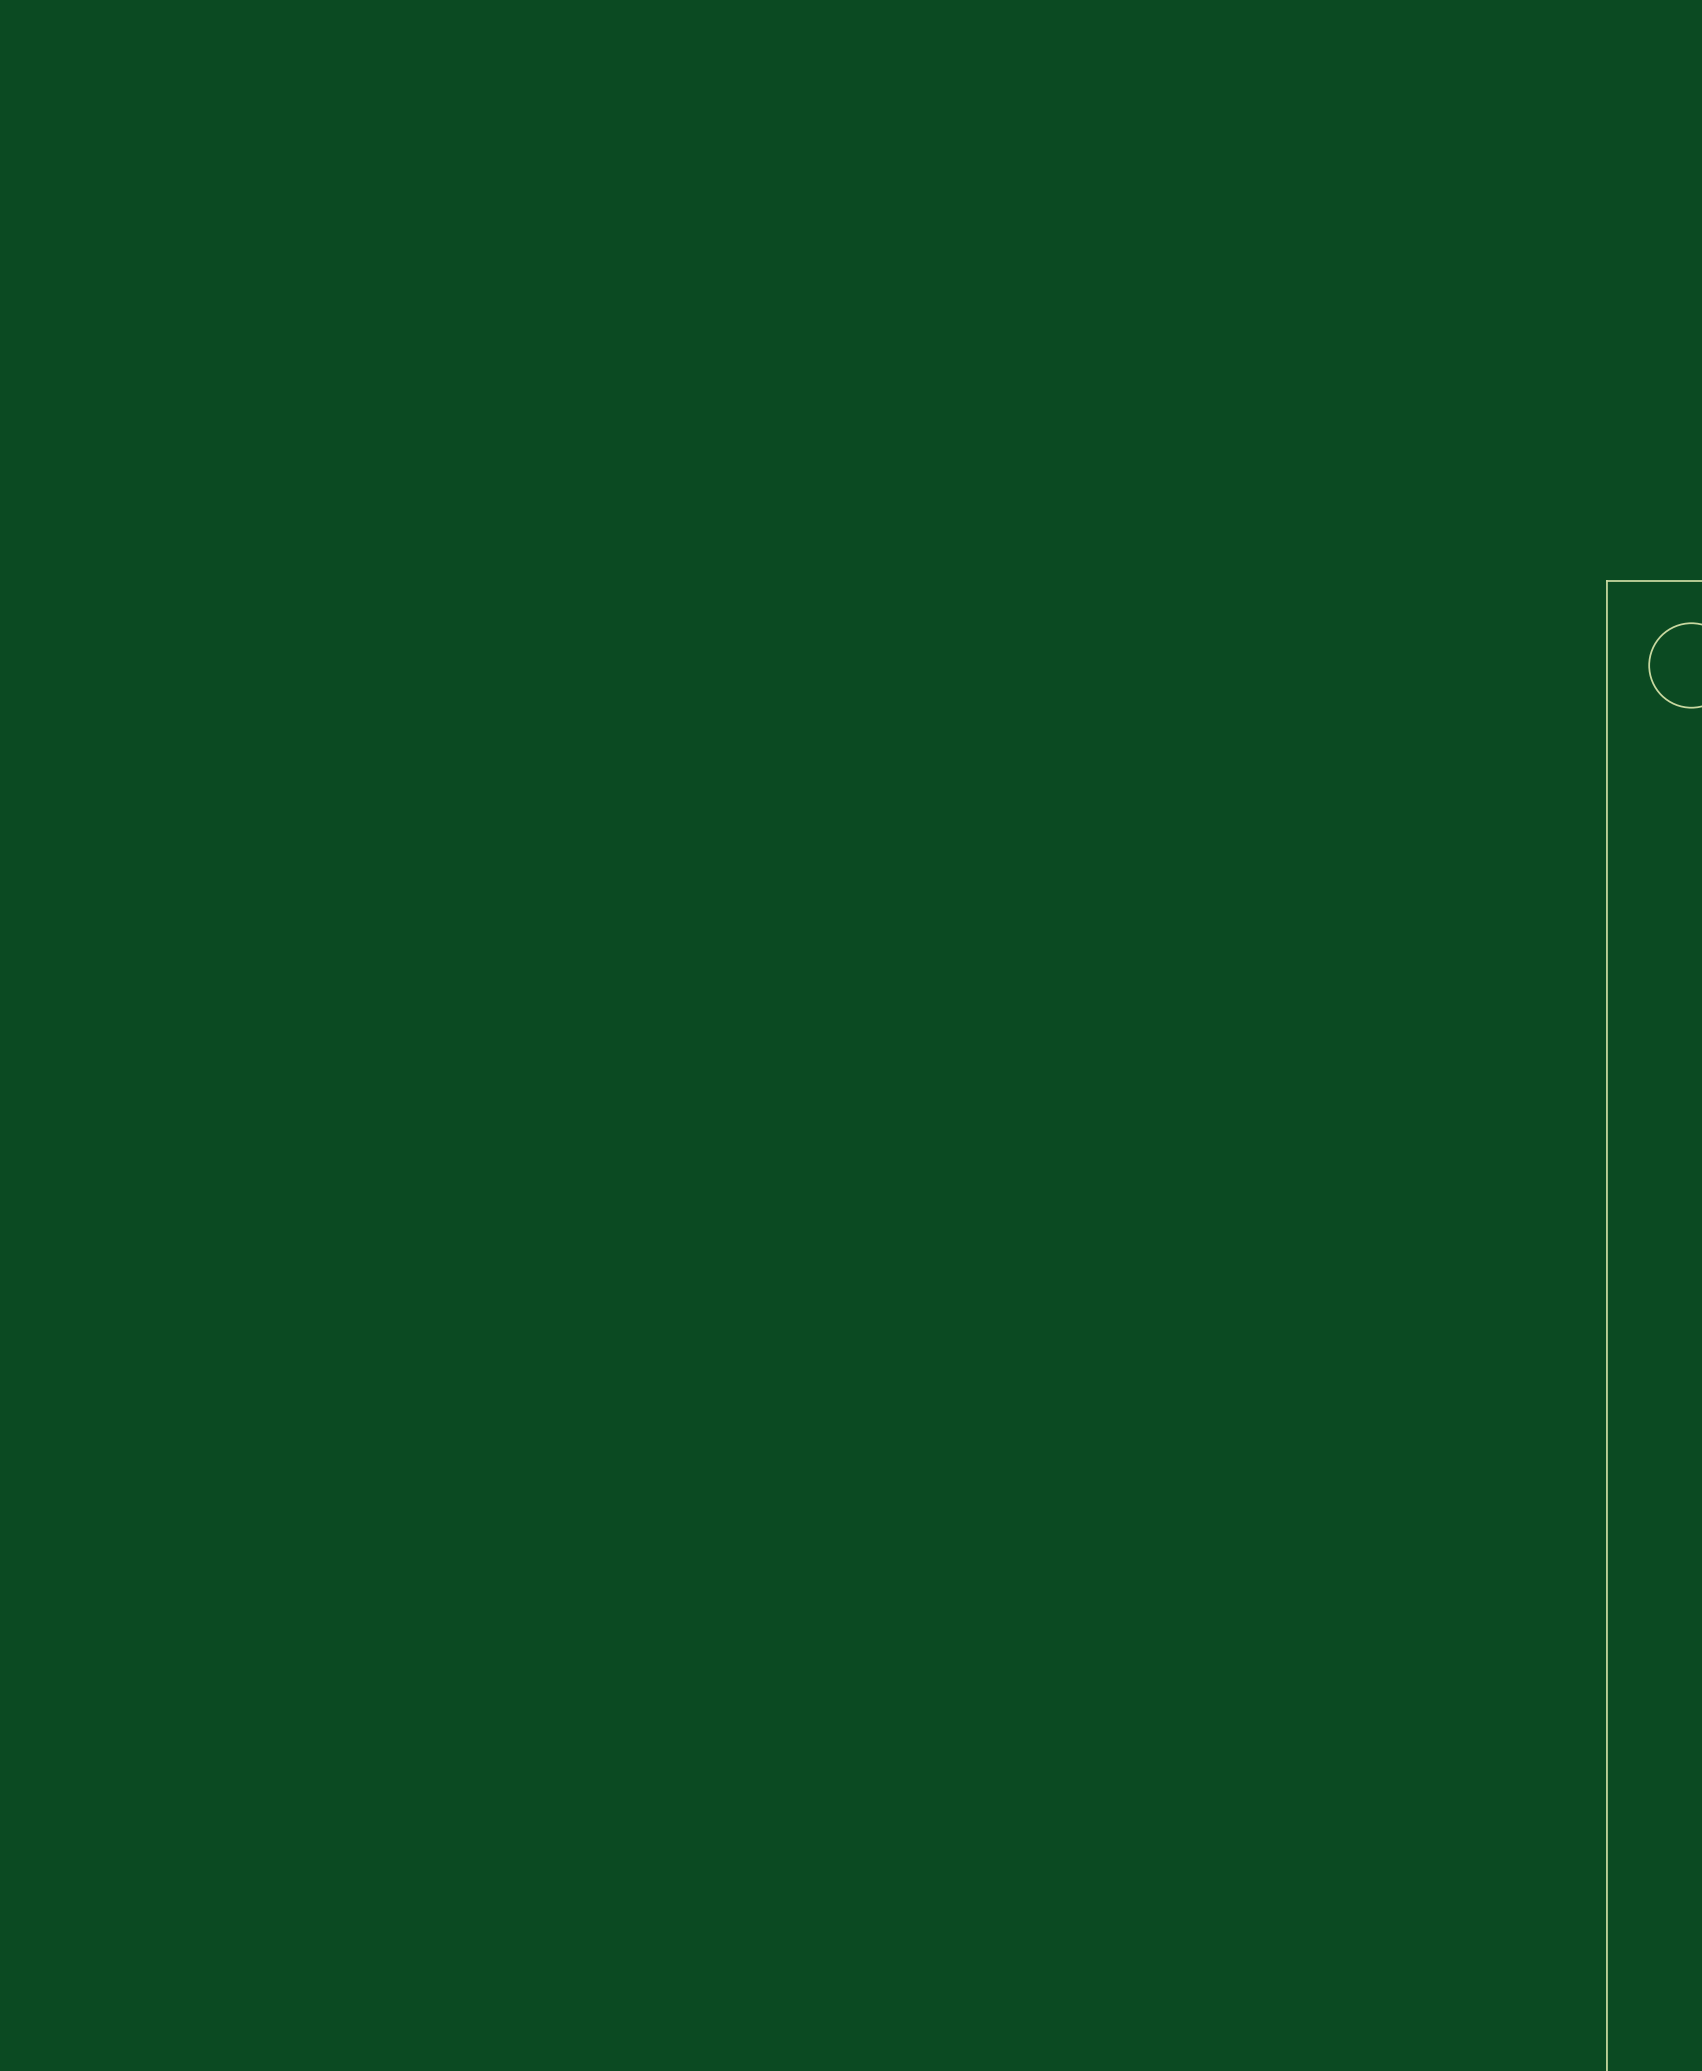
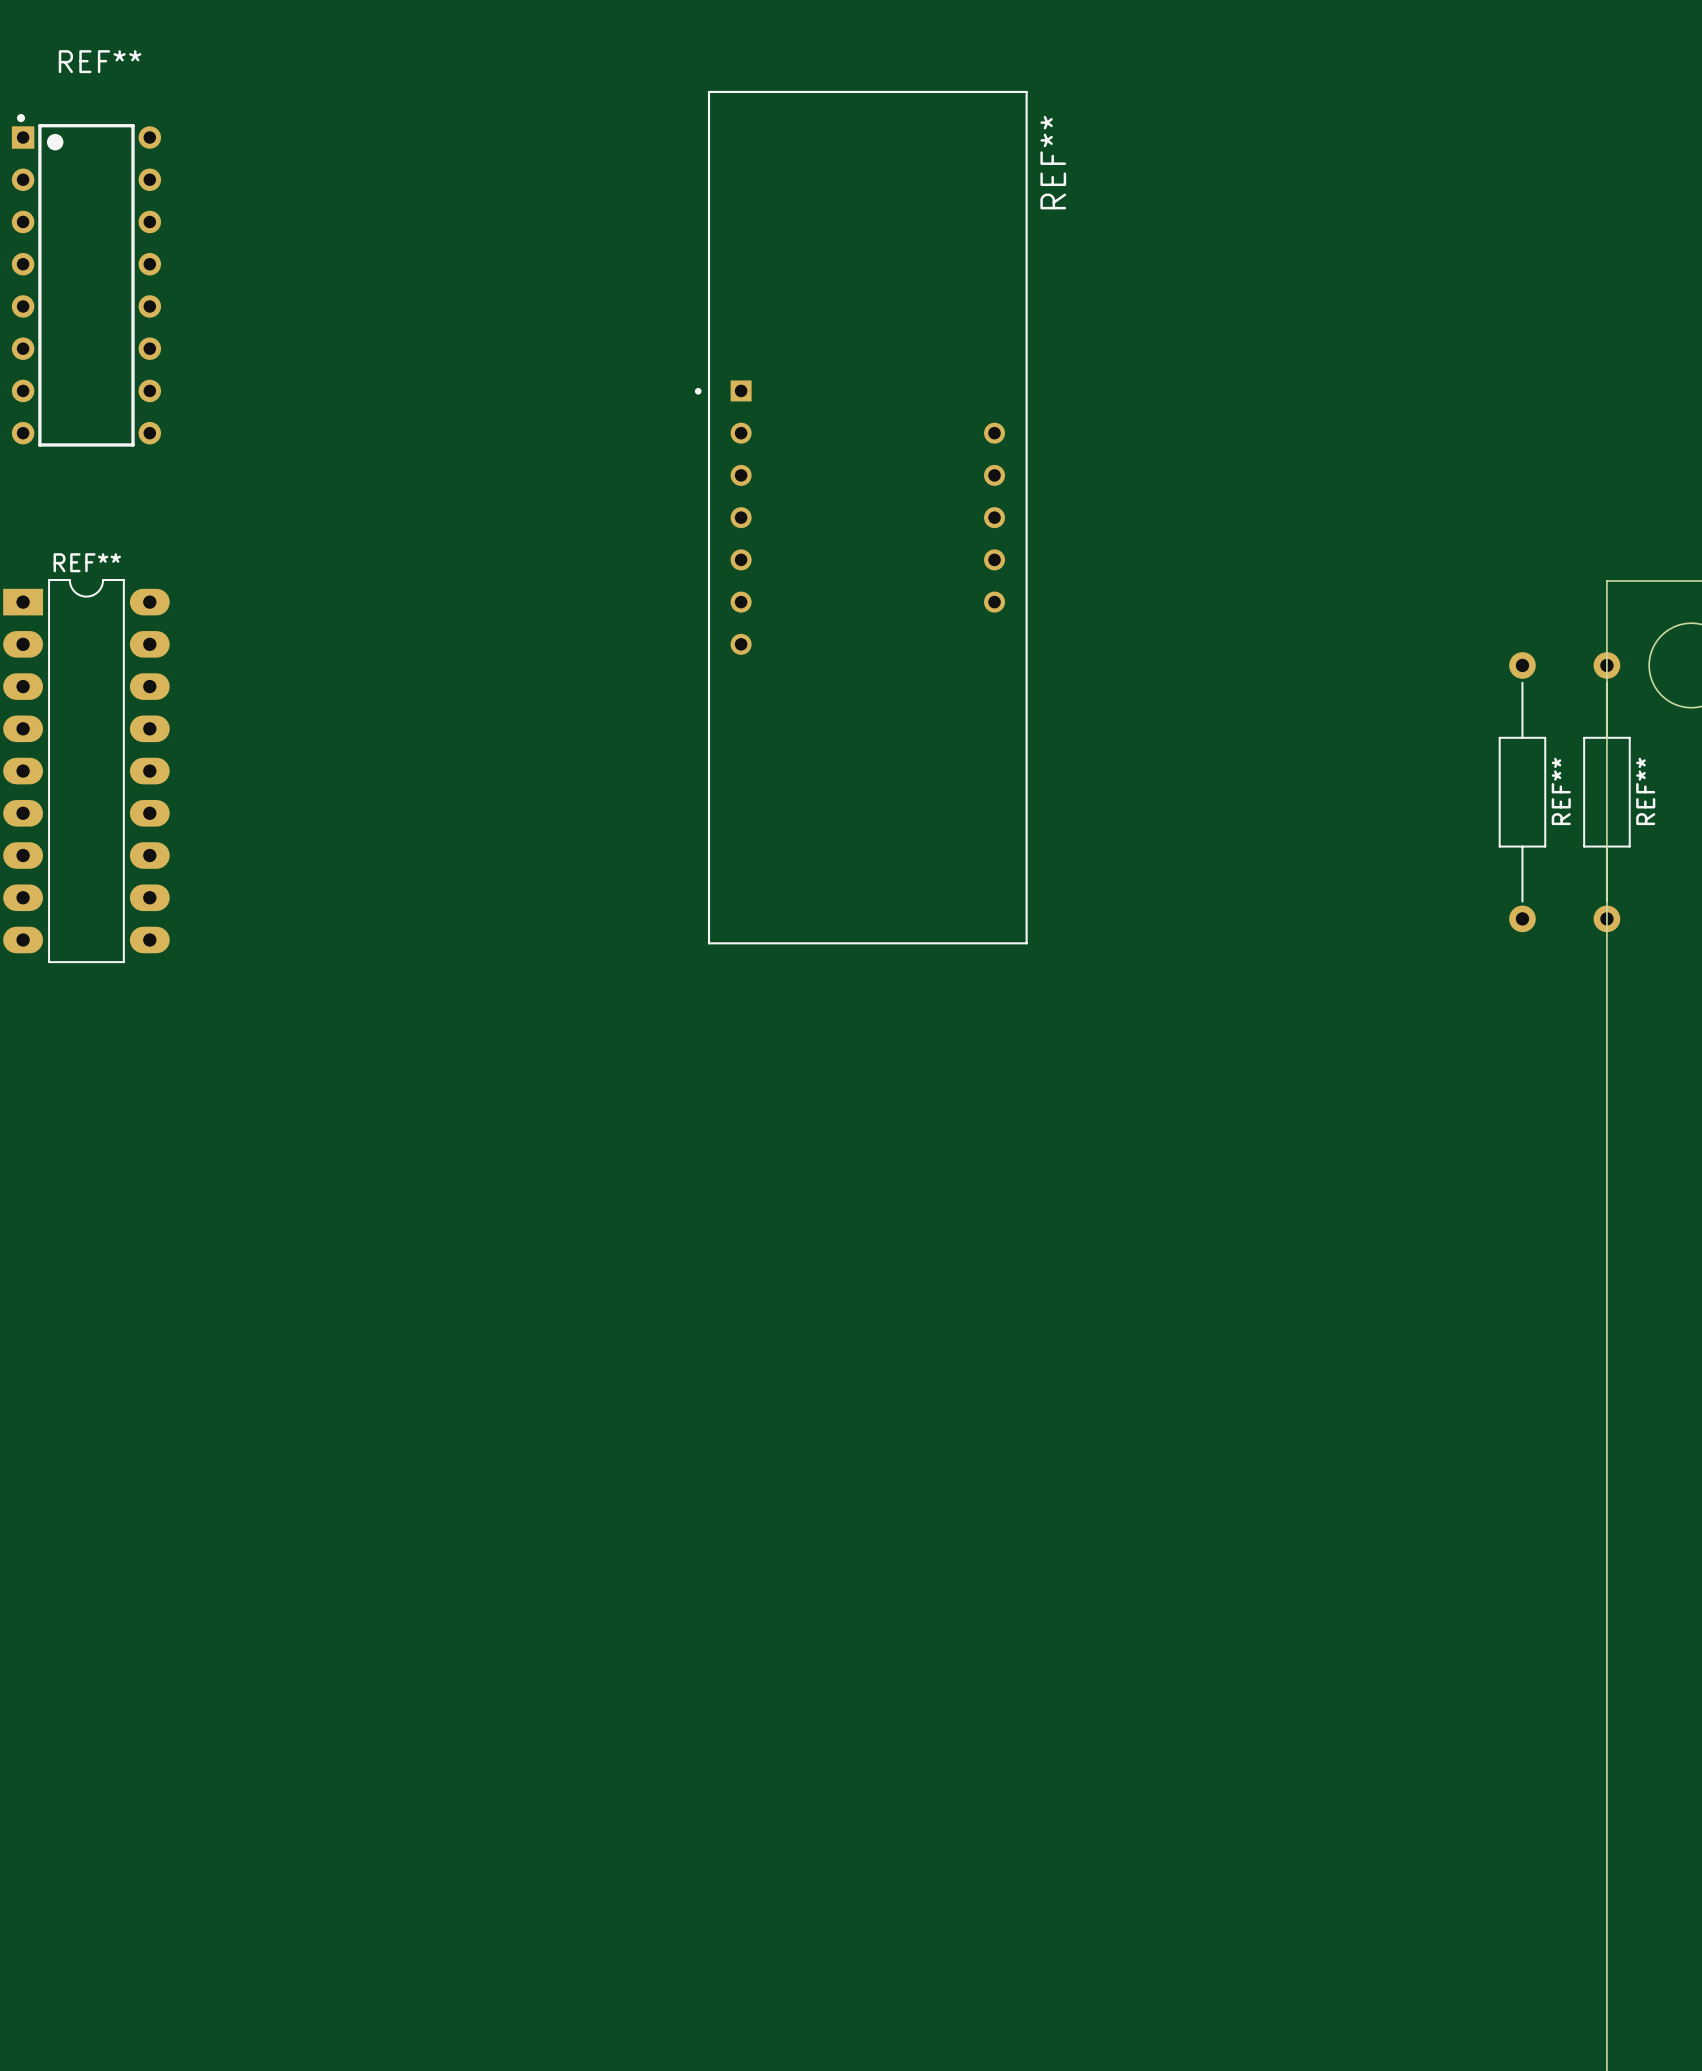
REF**: none -> (86, 280)
REF**: none -> (861, 517)
REF**: none -> (86, 771)
REF**: none -> (1522, 792)
REF**: none -> (1606, 792)

